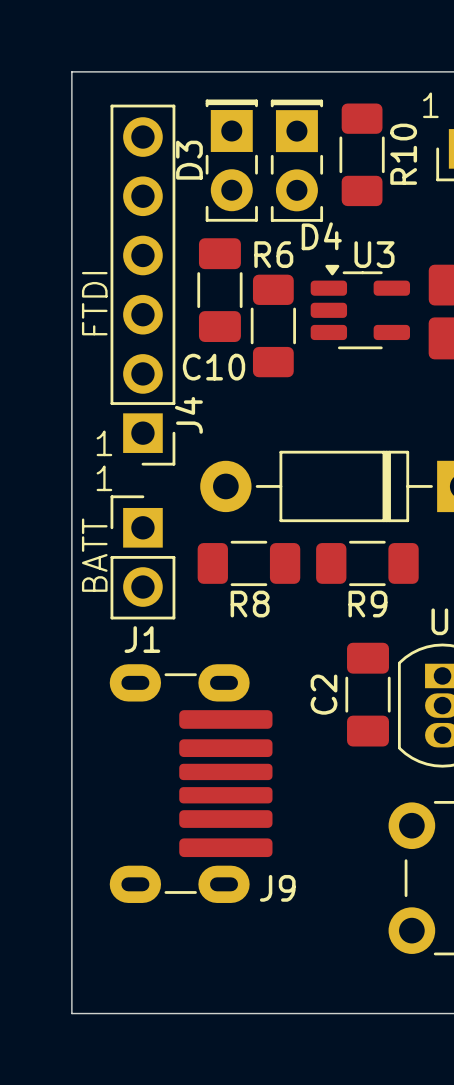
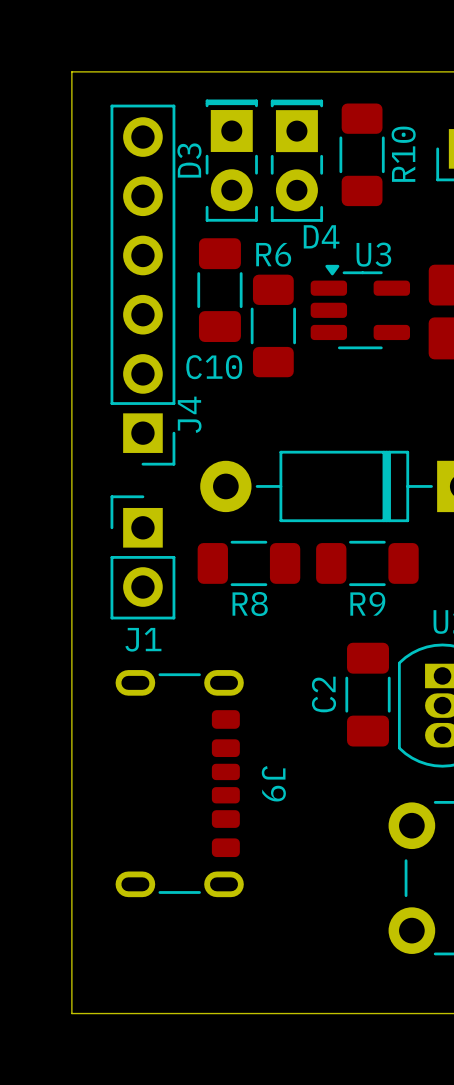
text: 1 (430, 105) -> none
text: FTDI (94, 303) -> none
text: 1 (104, 443) -> none
text: 1 (104, 478) -> none
text: BATT (94, 555) -> none
J9 footprint: [109, 664, 273, 903] -> [115, 670, 244, 898]
J9 name position: J9 (277, 888) -> J9 (273, 783)

